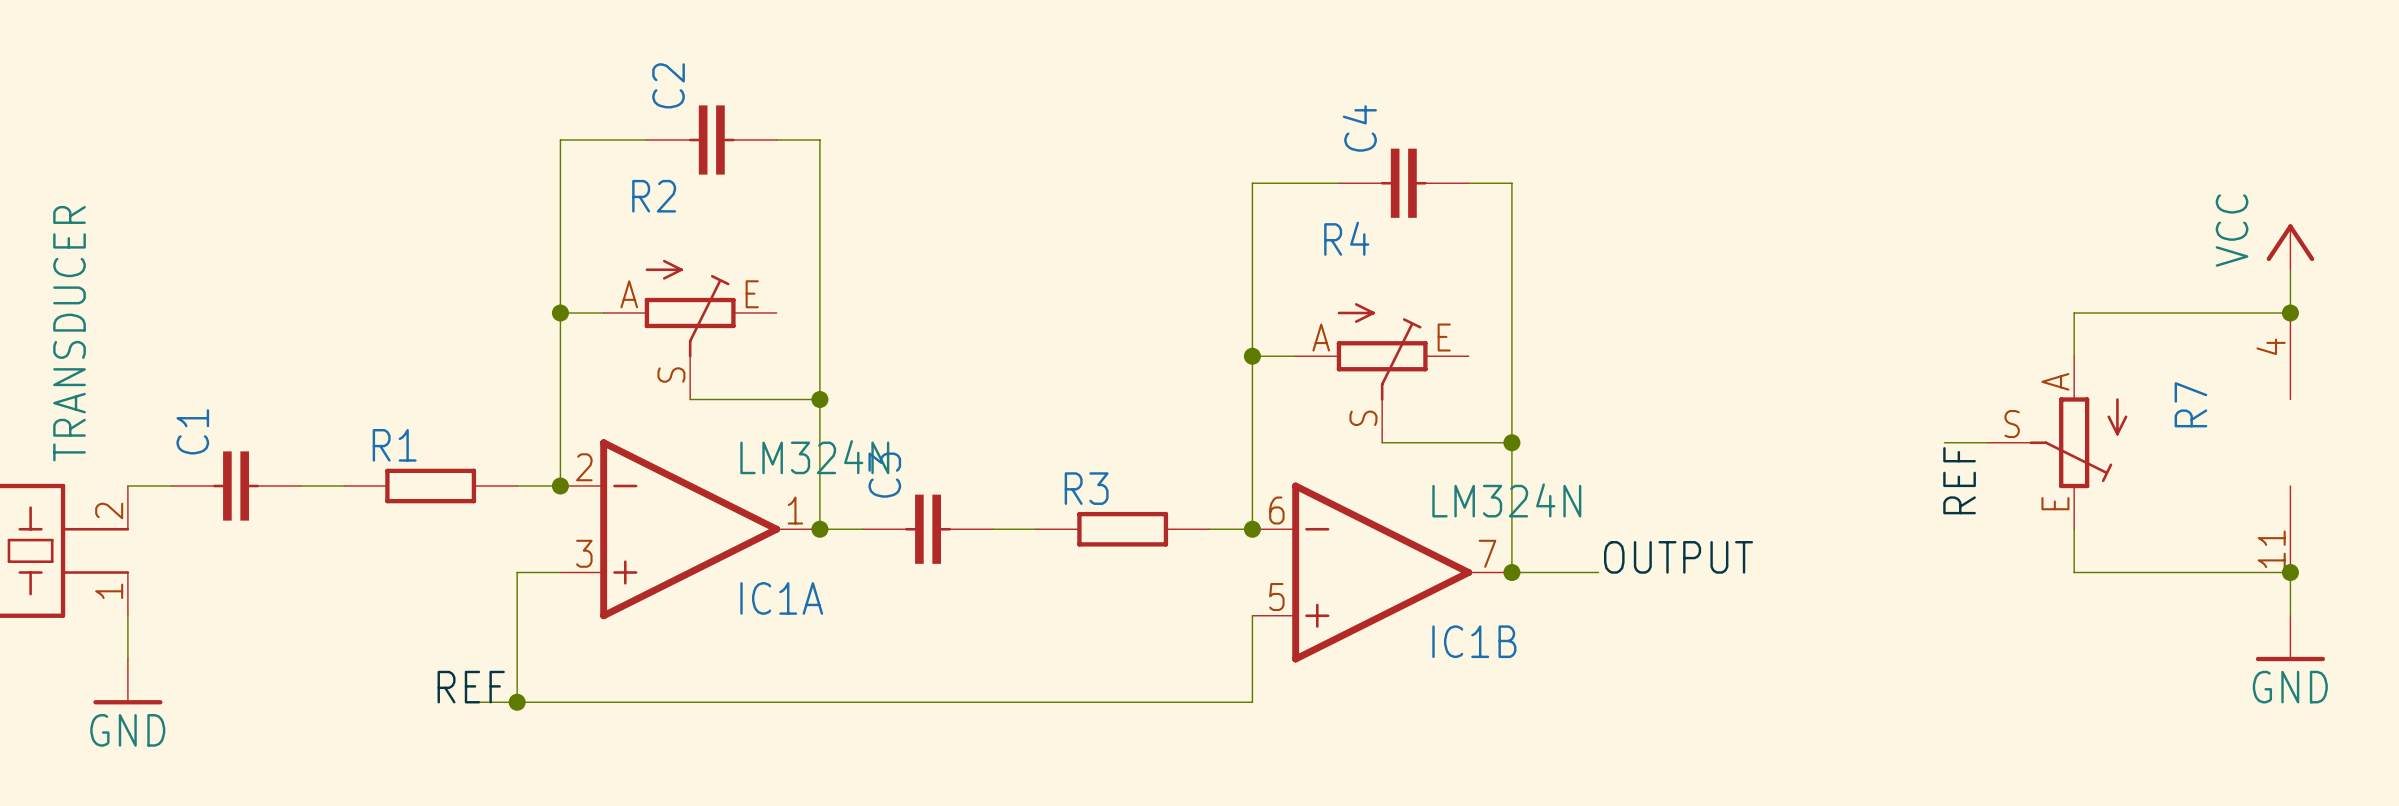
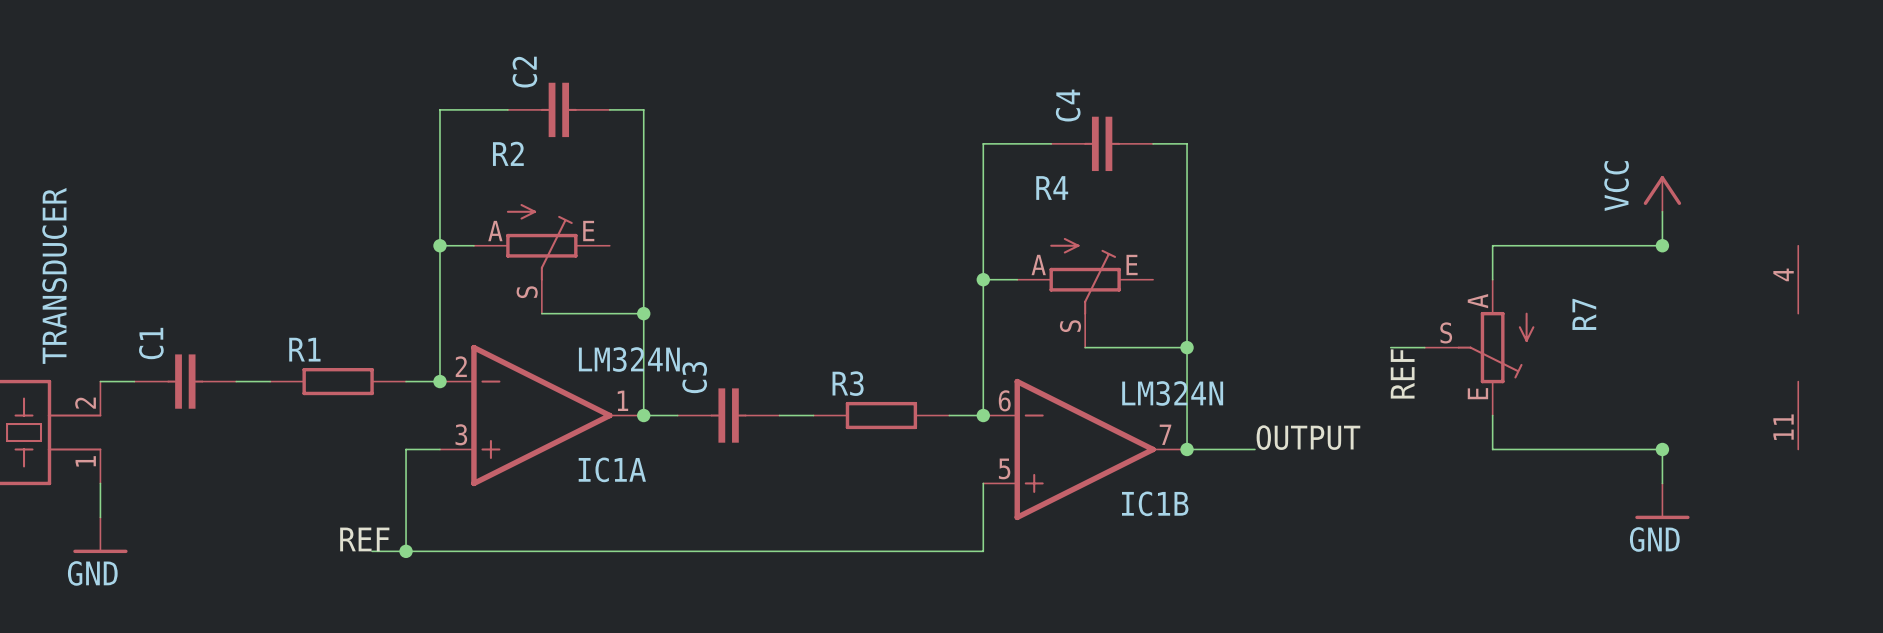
power symbol position: VCC (2290, 247) -> VCC (1662, 193)
wire: (2290, 269) (2290, 313) (2117, 313) -> (1662, 211) (1662, 245)
wire: (2074, 313) (2074, 356) -> (1628, 245) (1492, 245) (1492, 279)
junction: none -> (1662, 245)
junction: (2290, 313) -> none
wire: (1944, 442) (1987, 442) -> (1390, 347) (1424, 347)
R7 position: (2057, 442) -> (1479, 347)
label position: REF (1959, 480) -> REF (1402, 373)
wire: (2074, 529) (2074, 572) -> (1492, 415) (1492, 449) (1628, 449)
wire: (2117, 572) (2290, 572) (2290, 615) -> (1662, 449) (1662, 483)
junction: none -> (1662, 449)
junction: (2290, 572) -> none
power symbol position: GND (2290, 638) -> GND (1662, 501)

